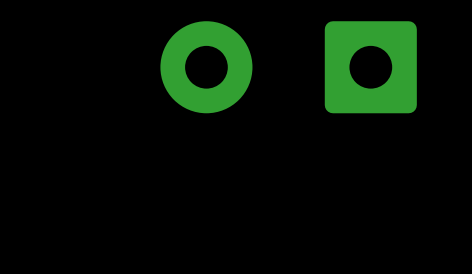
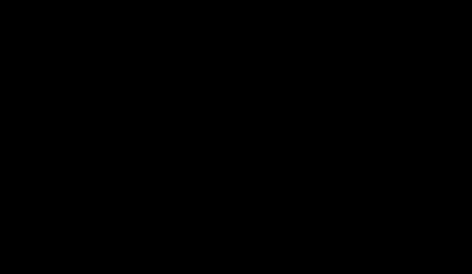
part: (288, 67) -> none

